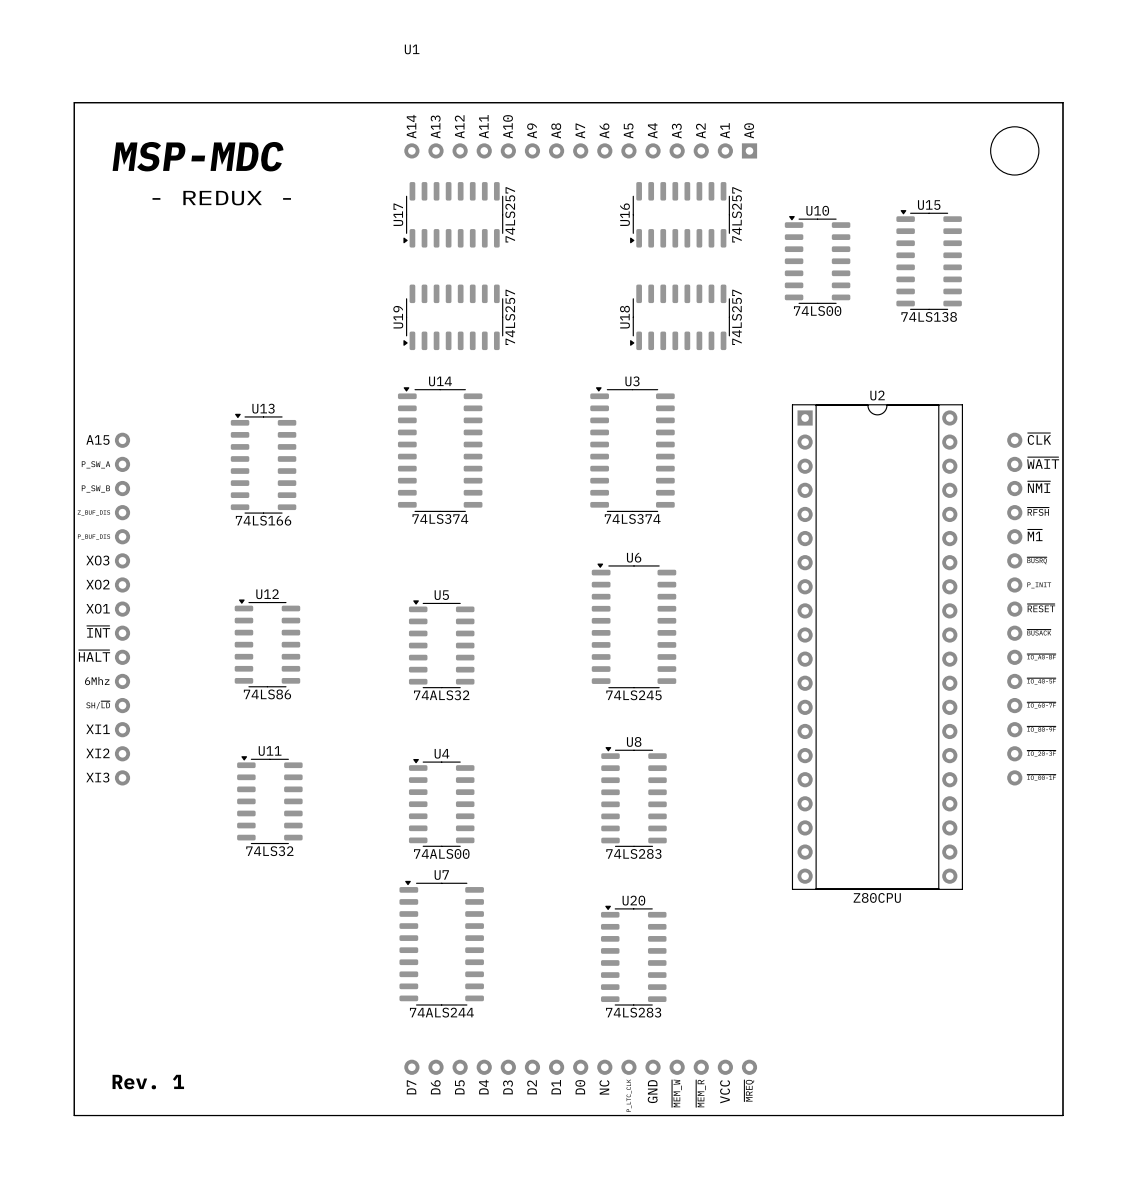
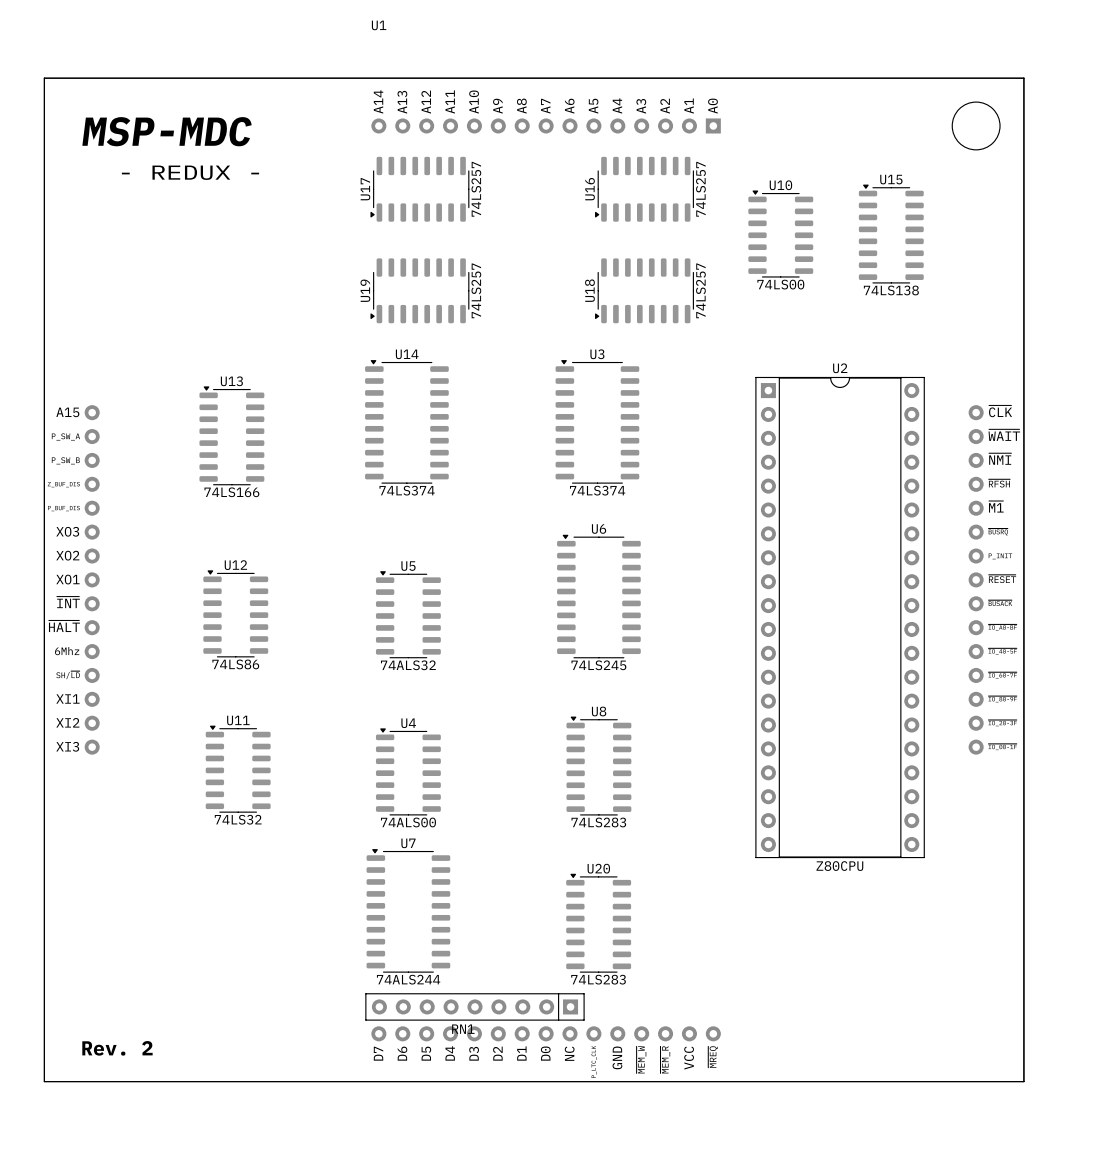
RN1: none -> (474, 1006)
text: Rev. 1 (148, 1082) -> Rev. 2 (117, 1048)

